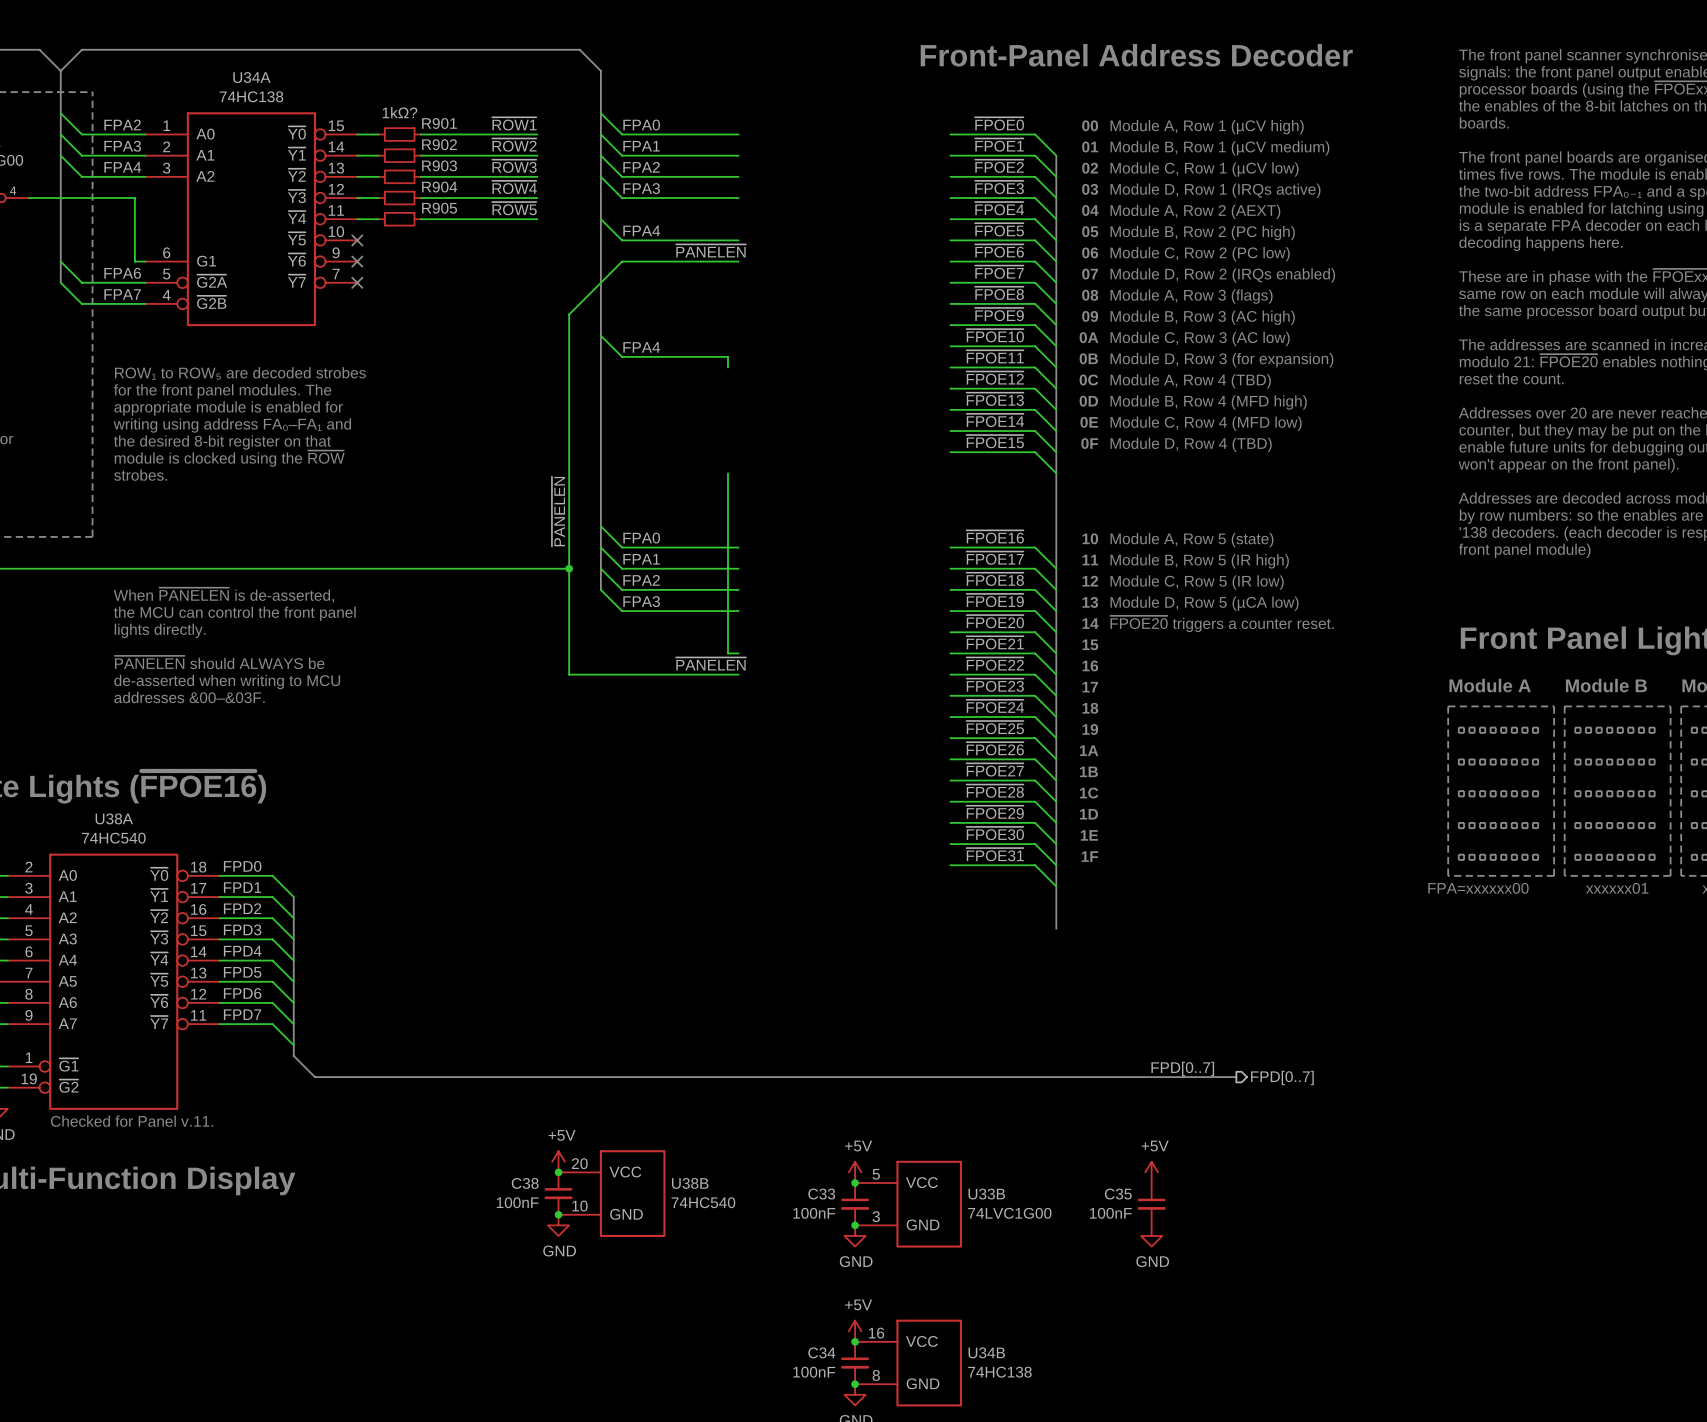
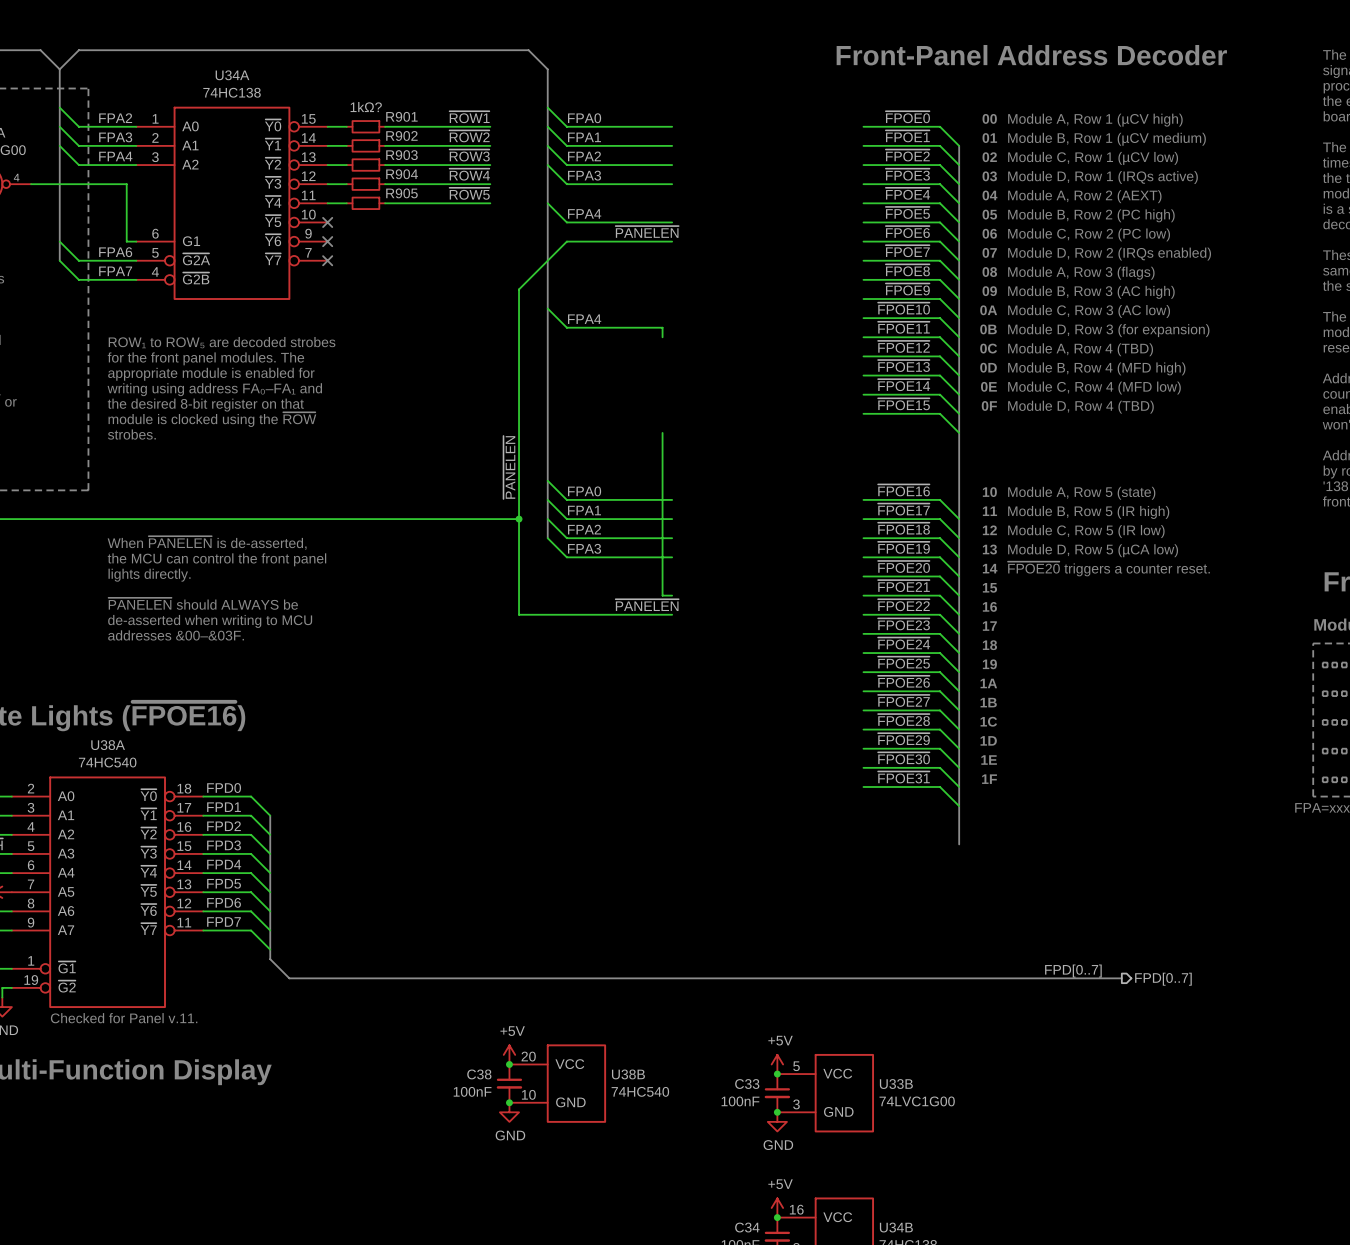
power symbol: +5V (1151, 1172) -> none
C35: 100nF (1151, 1204) -> none
power symbol: GND (1151, 1235) -> none

